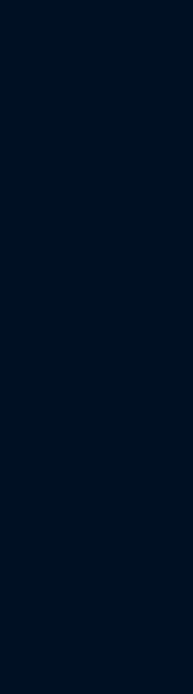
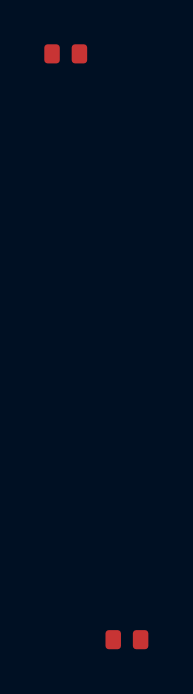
part: none -> (65, 53)
part: none -> (126, 639)

